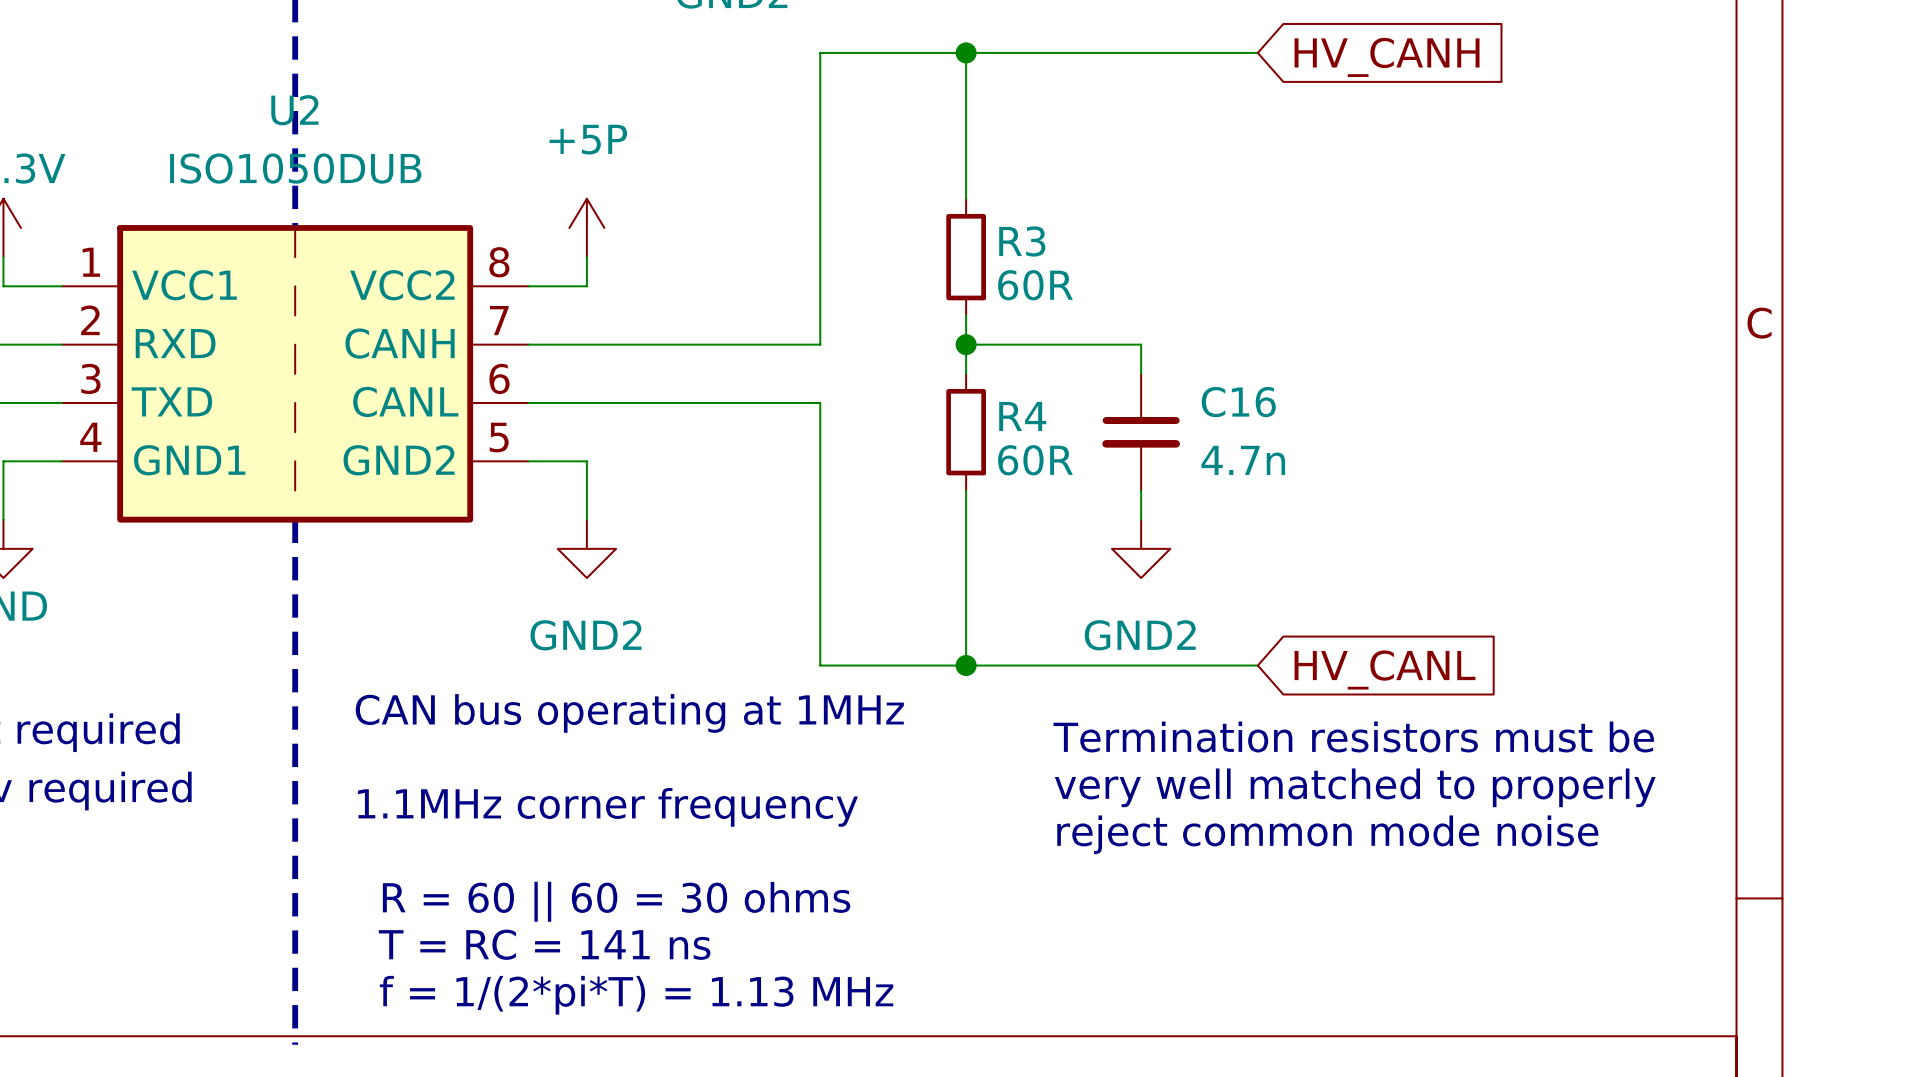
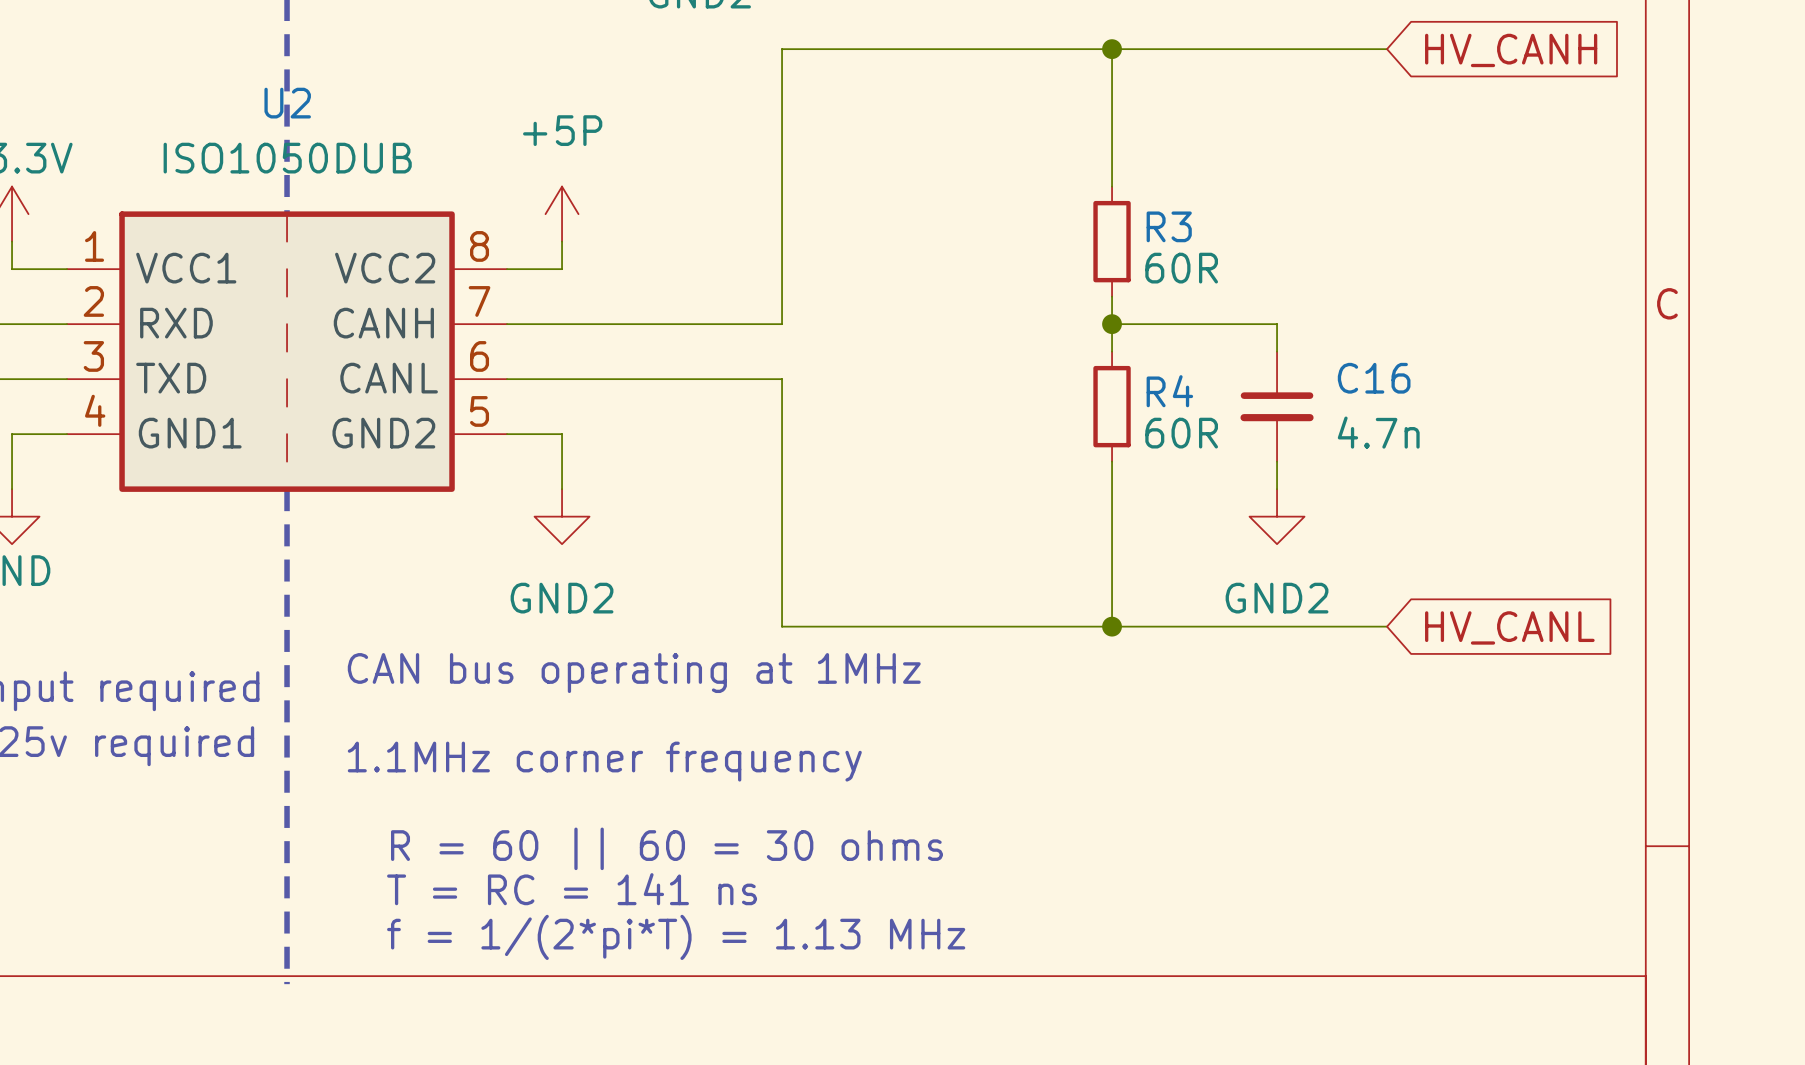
wire: (966, 52) (966, 198) -> (1112, 49) (1112, 186)
junction: (966, 52) -> none
junction: none -> (1112, 49)
wire: none -> (1194, 49) (1387, 49)
global label position: HV_CANH (1387, 57) -> HV_CANH (1511, 50)
R3 position: (966, 257) -> (1112, 241)
wire: (966, 315) (966, 373) -> (1112, 296) (1112, 351)
wire: (966, 344) (1141, 344) (1141, 373) -> (1112, 324) (1277, 324) (1277, 351)
junction: (966, 344) -> none
junction: none -> (1112, 324)
R4 position: (966, 432) -> (1112, 406)
C16 position: (1141, 432) -> (1277, 406)
wire: (966, 490) (966, 665) -> (1112, 461) (1112, 626)
wire: (1141, 490) (1141, 519) -> (1277, 461) (1277, 489)
power symbol position: GND2 (1141, 548) -> GND2 (1277, 516)
junction: (966, 665) -> none
junction: none -> (1112, 626)
wire: none -> (1194, 626) (1387, 626)
global label position: HV_CANL (1385, 669) -> HV_CANL (1509, 627)
text: Termination resistors must be (1353, 736) -> none
text: very well matched to properly (1355, 787) -> none
text: reject common mode noise (1327, 834) -> none

